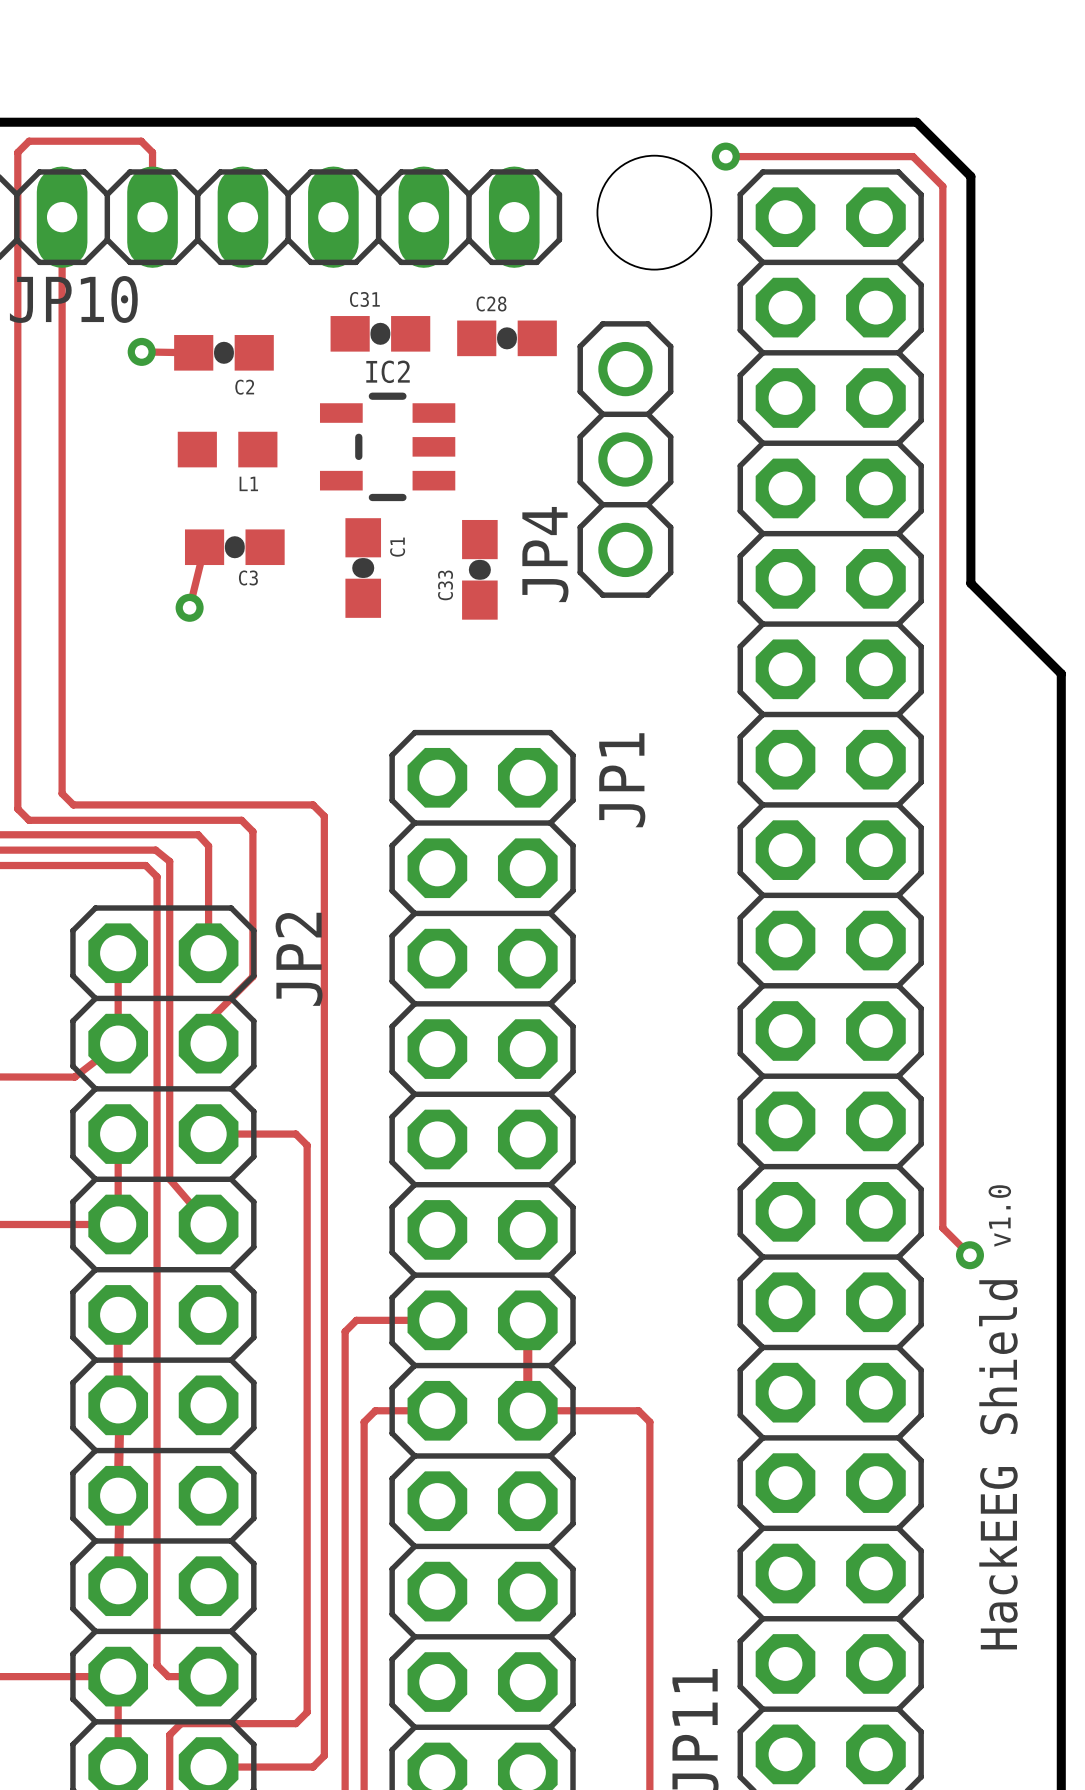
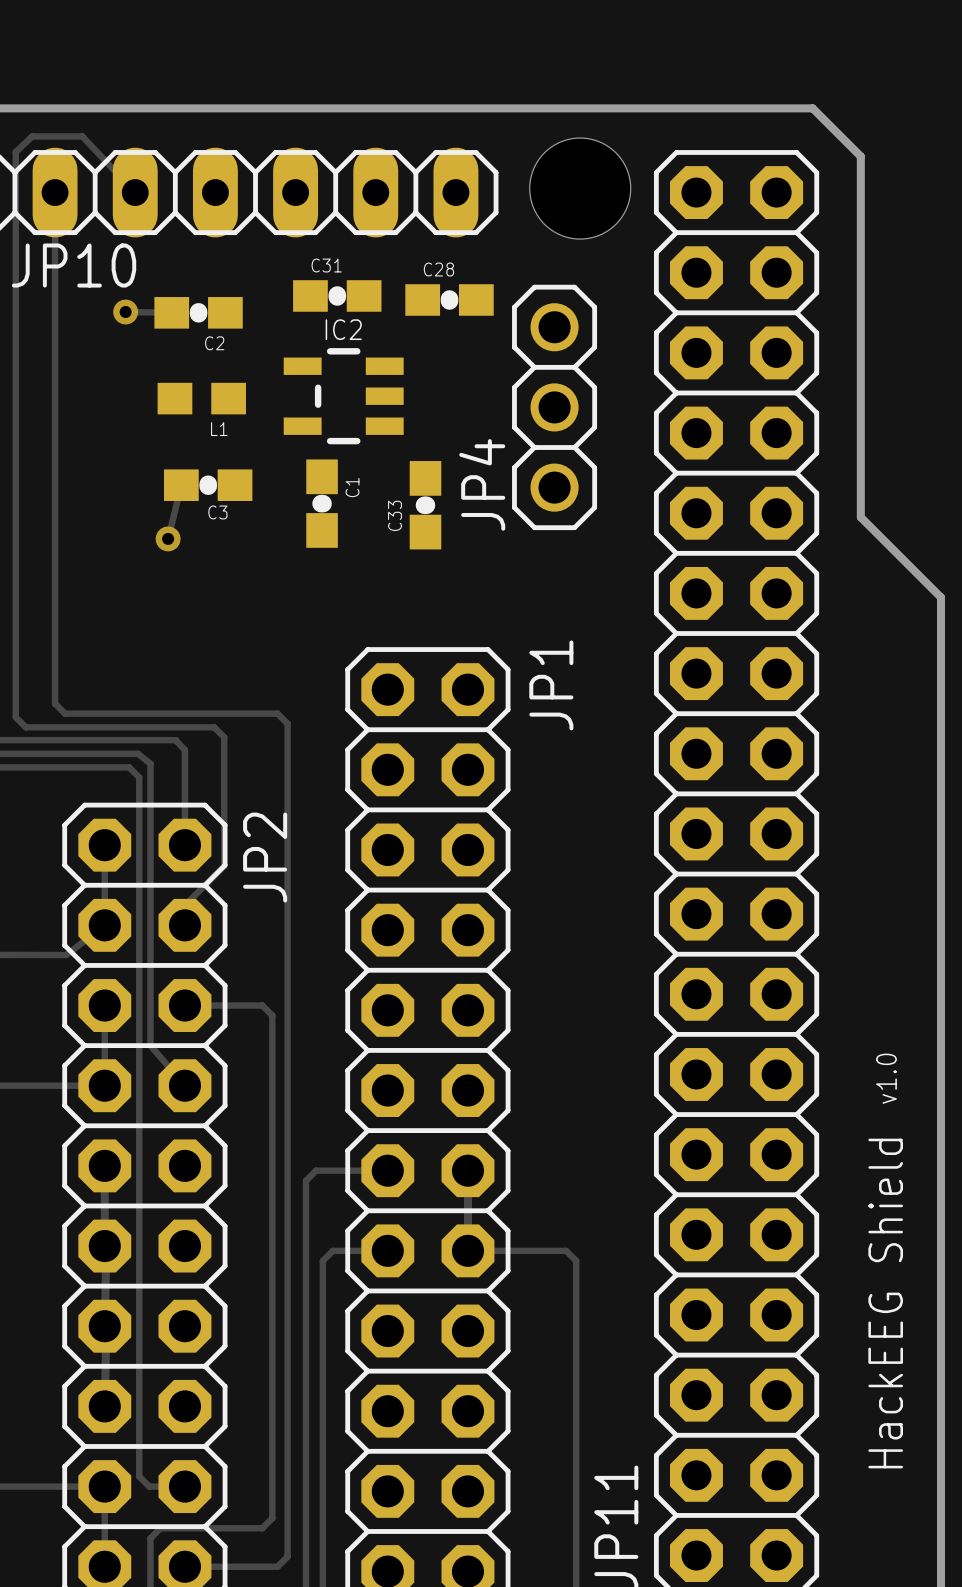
track: (725, 156) (913, 156) (942, 186) (942, 1228) (969, 1255) -> none
via: (725, 156) -> none
track: (17, 171) (17, 152) (29, 141) (141, 141) (152, 152) (152, 217) -> (15, 152) (32, 136) (82, 136) (135, 192)
via: (969, 1255) -> none

